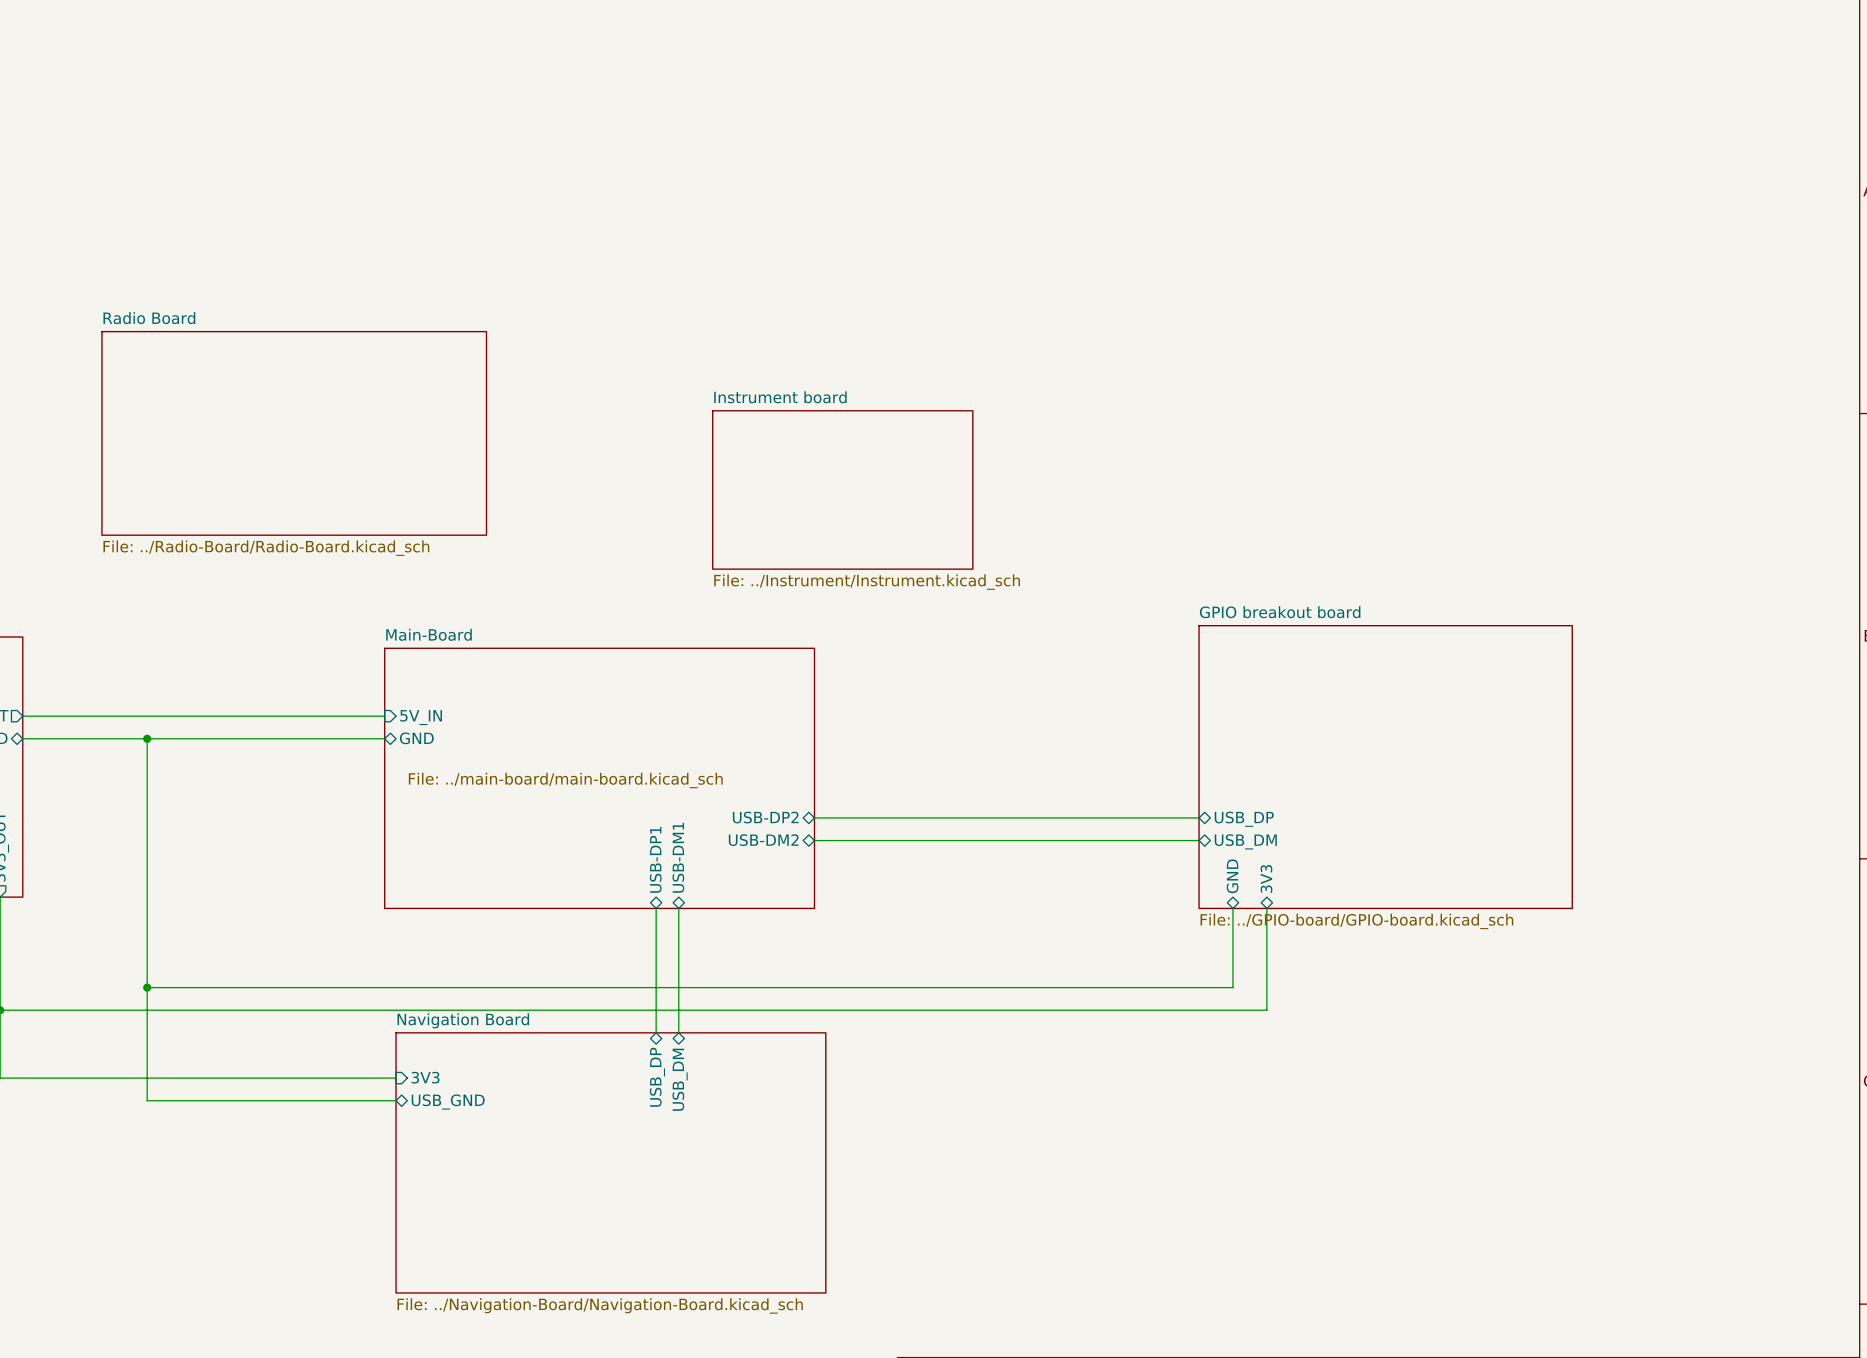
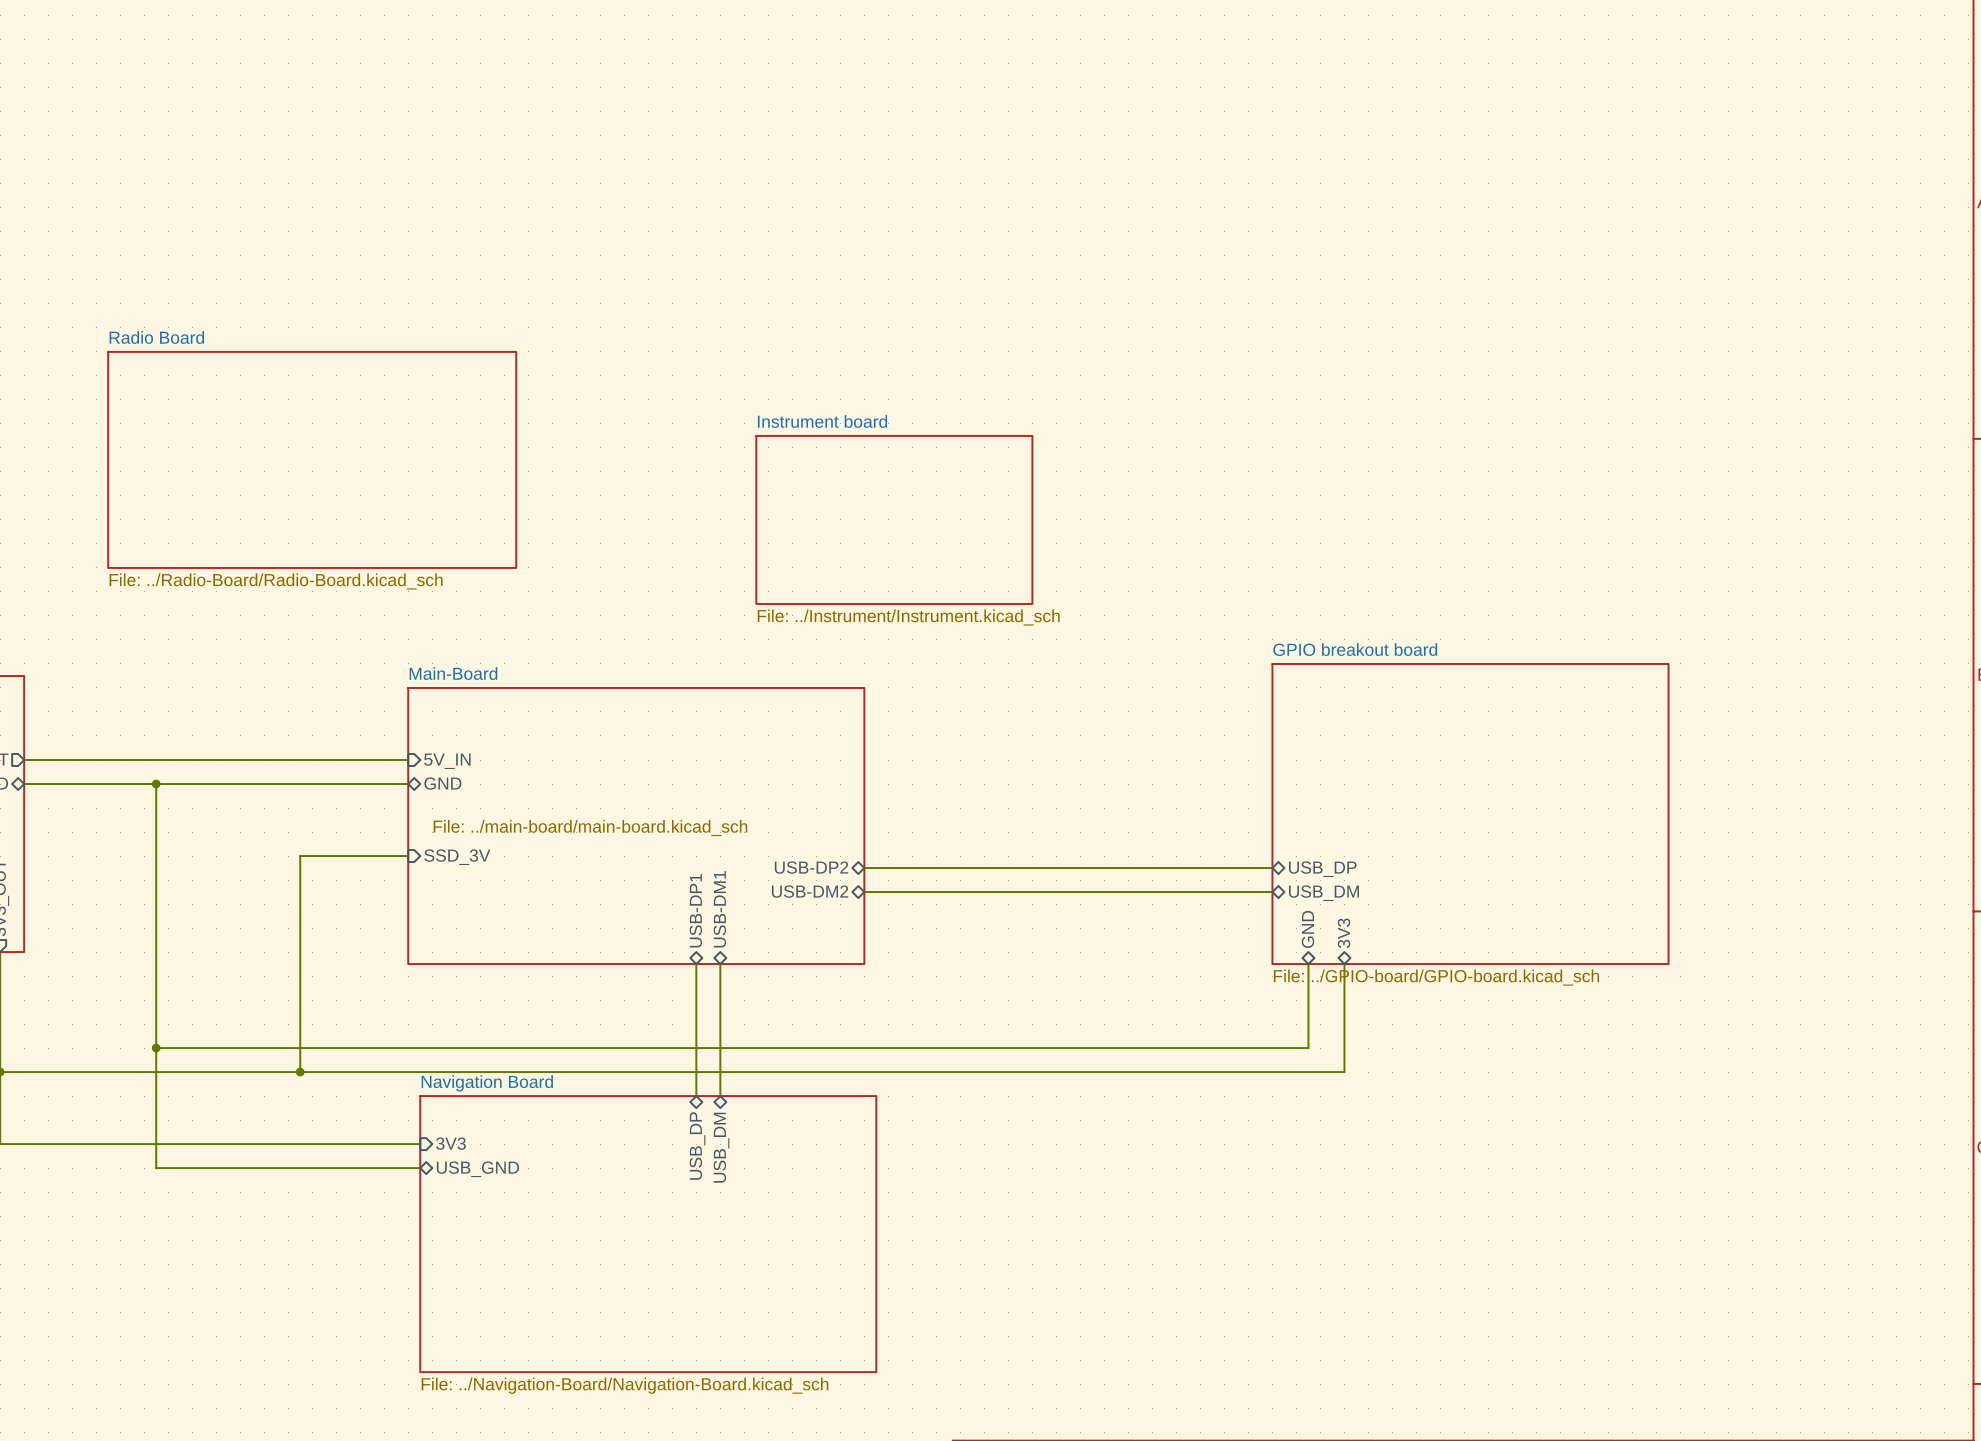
wire: none -> (408, 856) (300, 856) (300, 1072)
sheet pin: none -> SSD_3V (457, 857)
junction: none -> (300, 1072)

